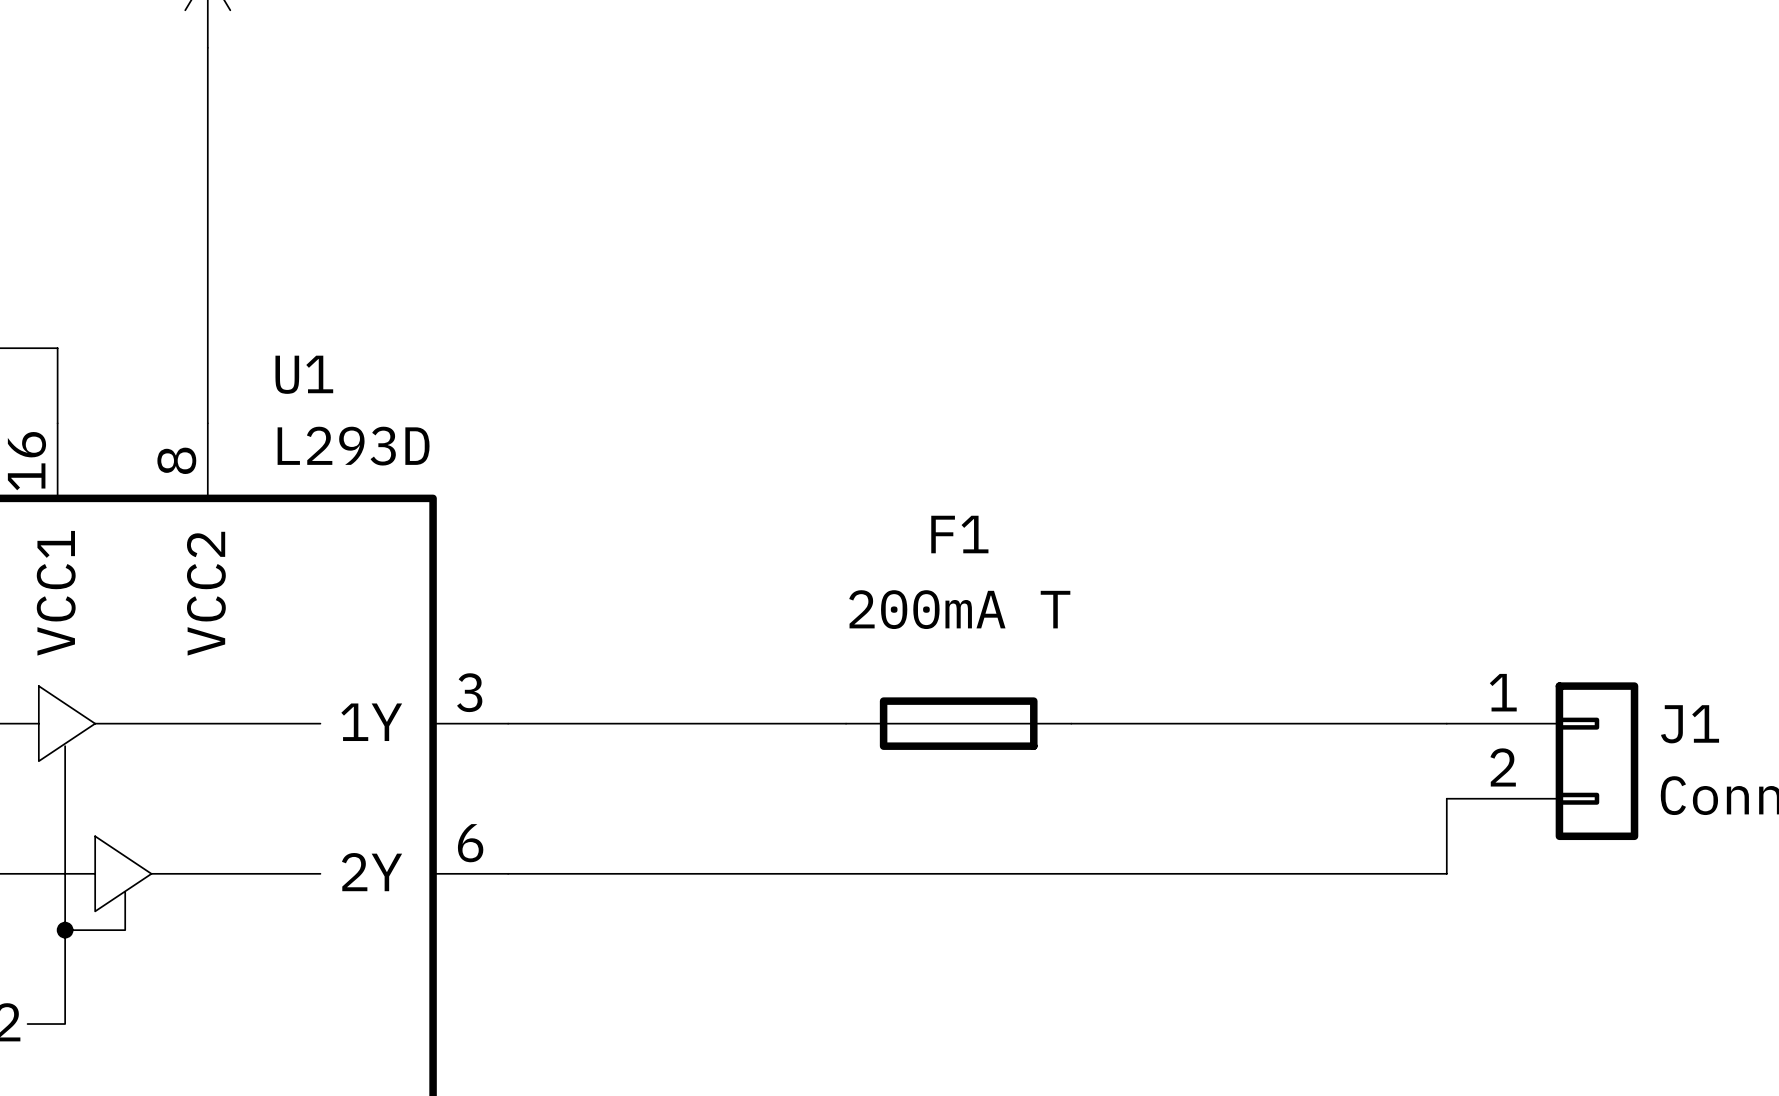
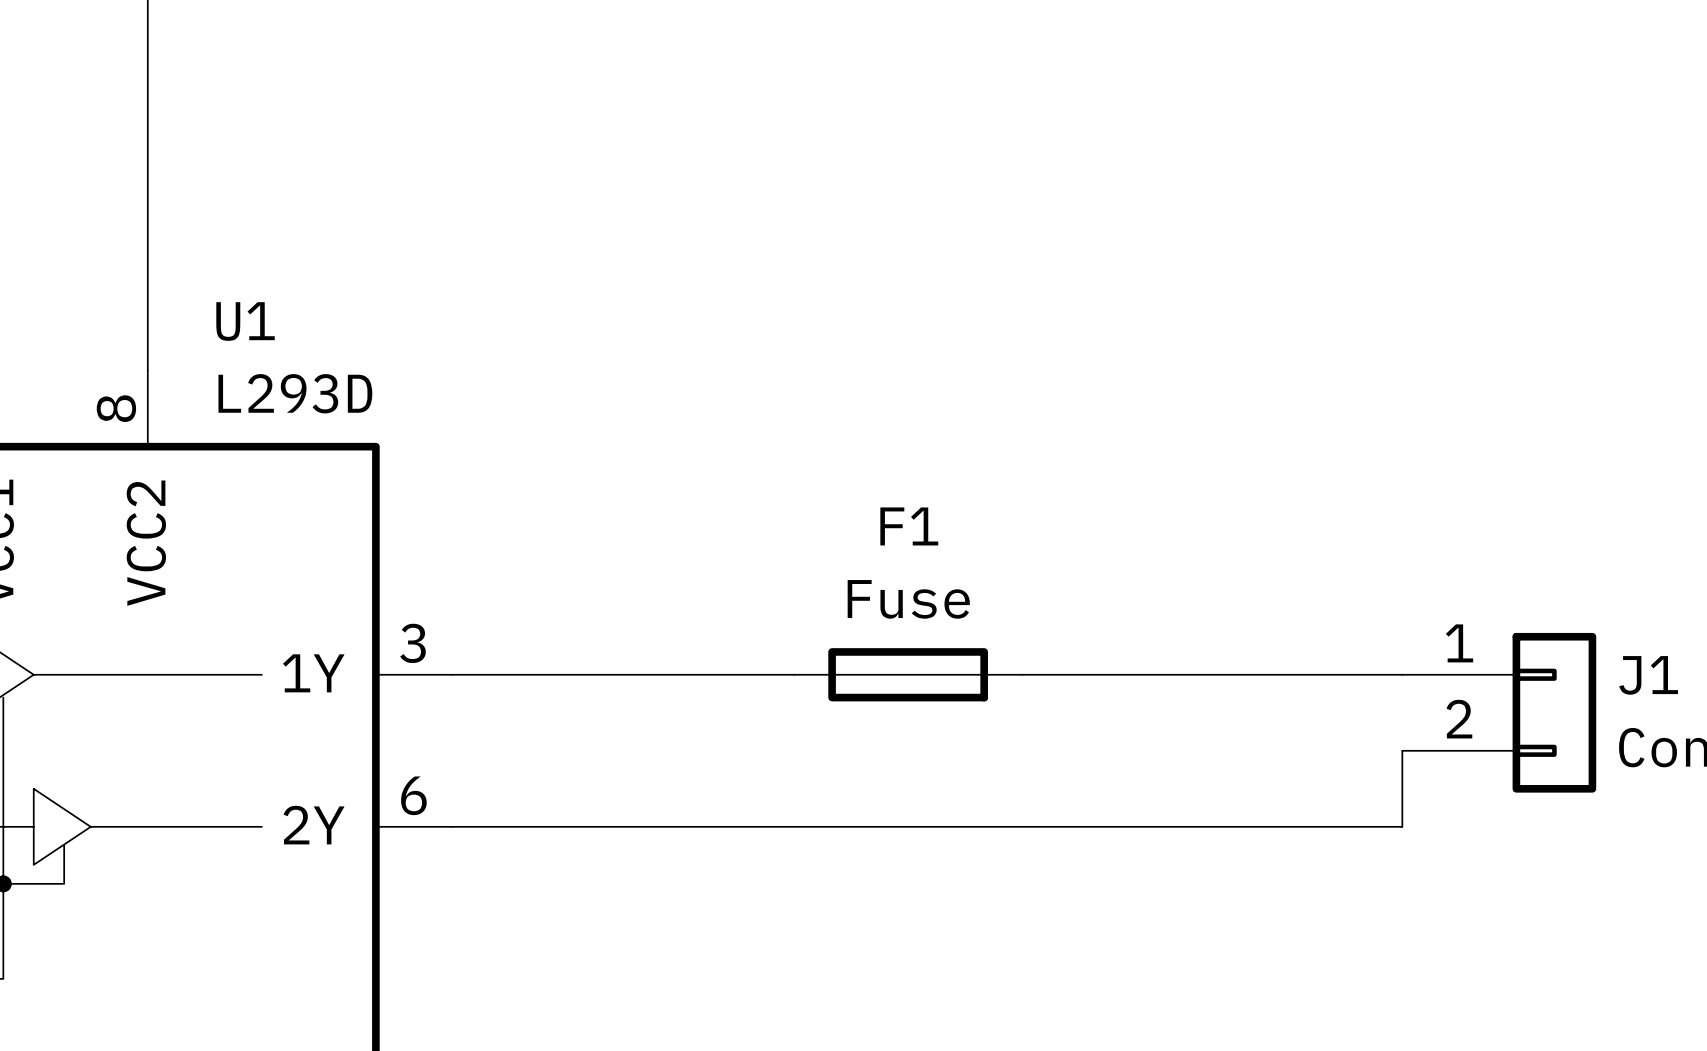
F1 name position: F1 (959, 534) -> F1 (909, 526)
F1 value: 200mA T (959, 609) -> Fuse (908, 599)

